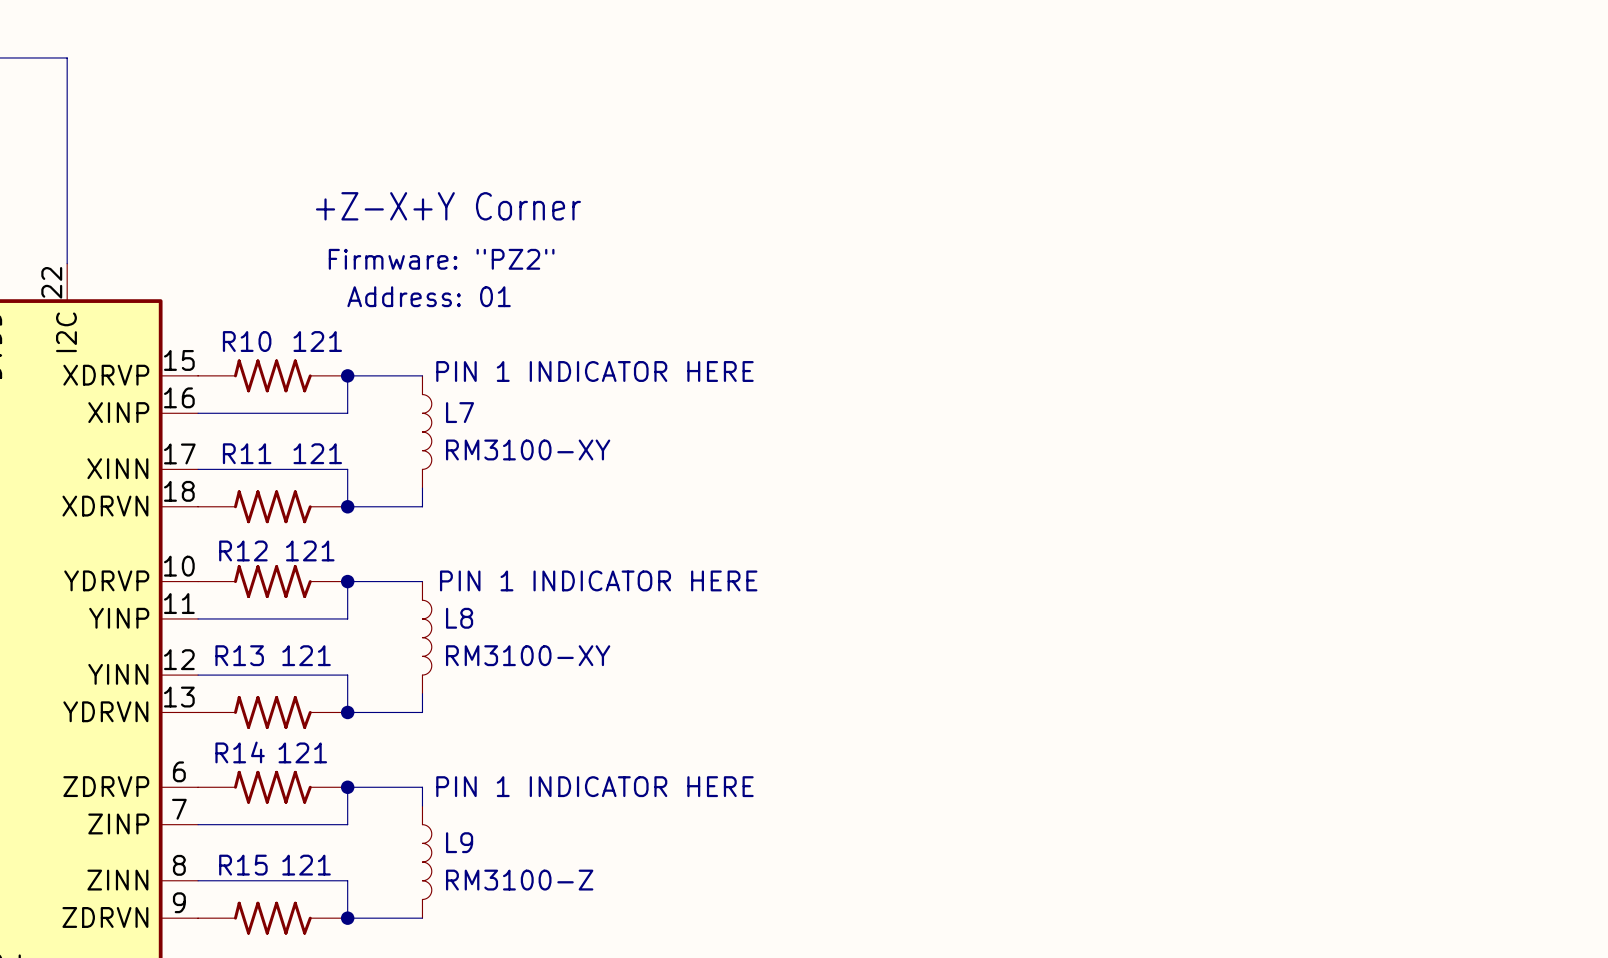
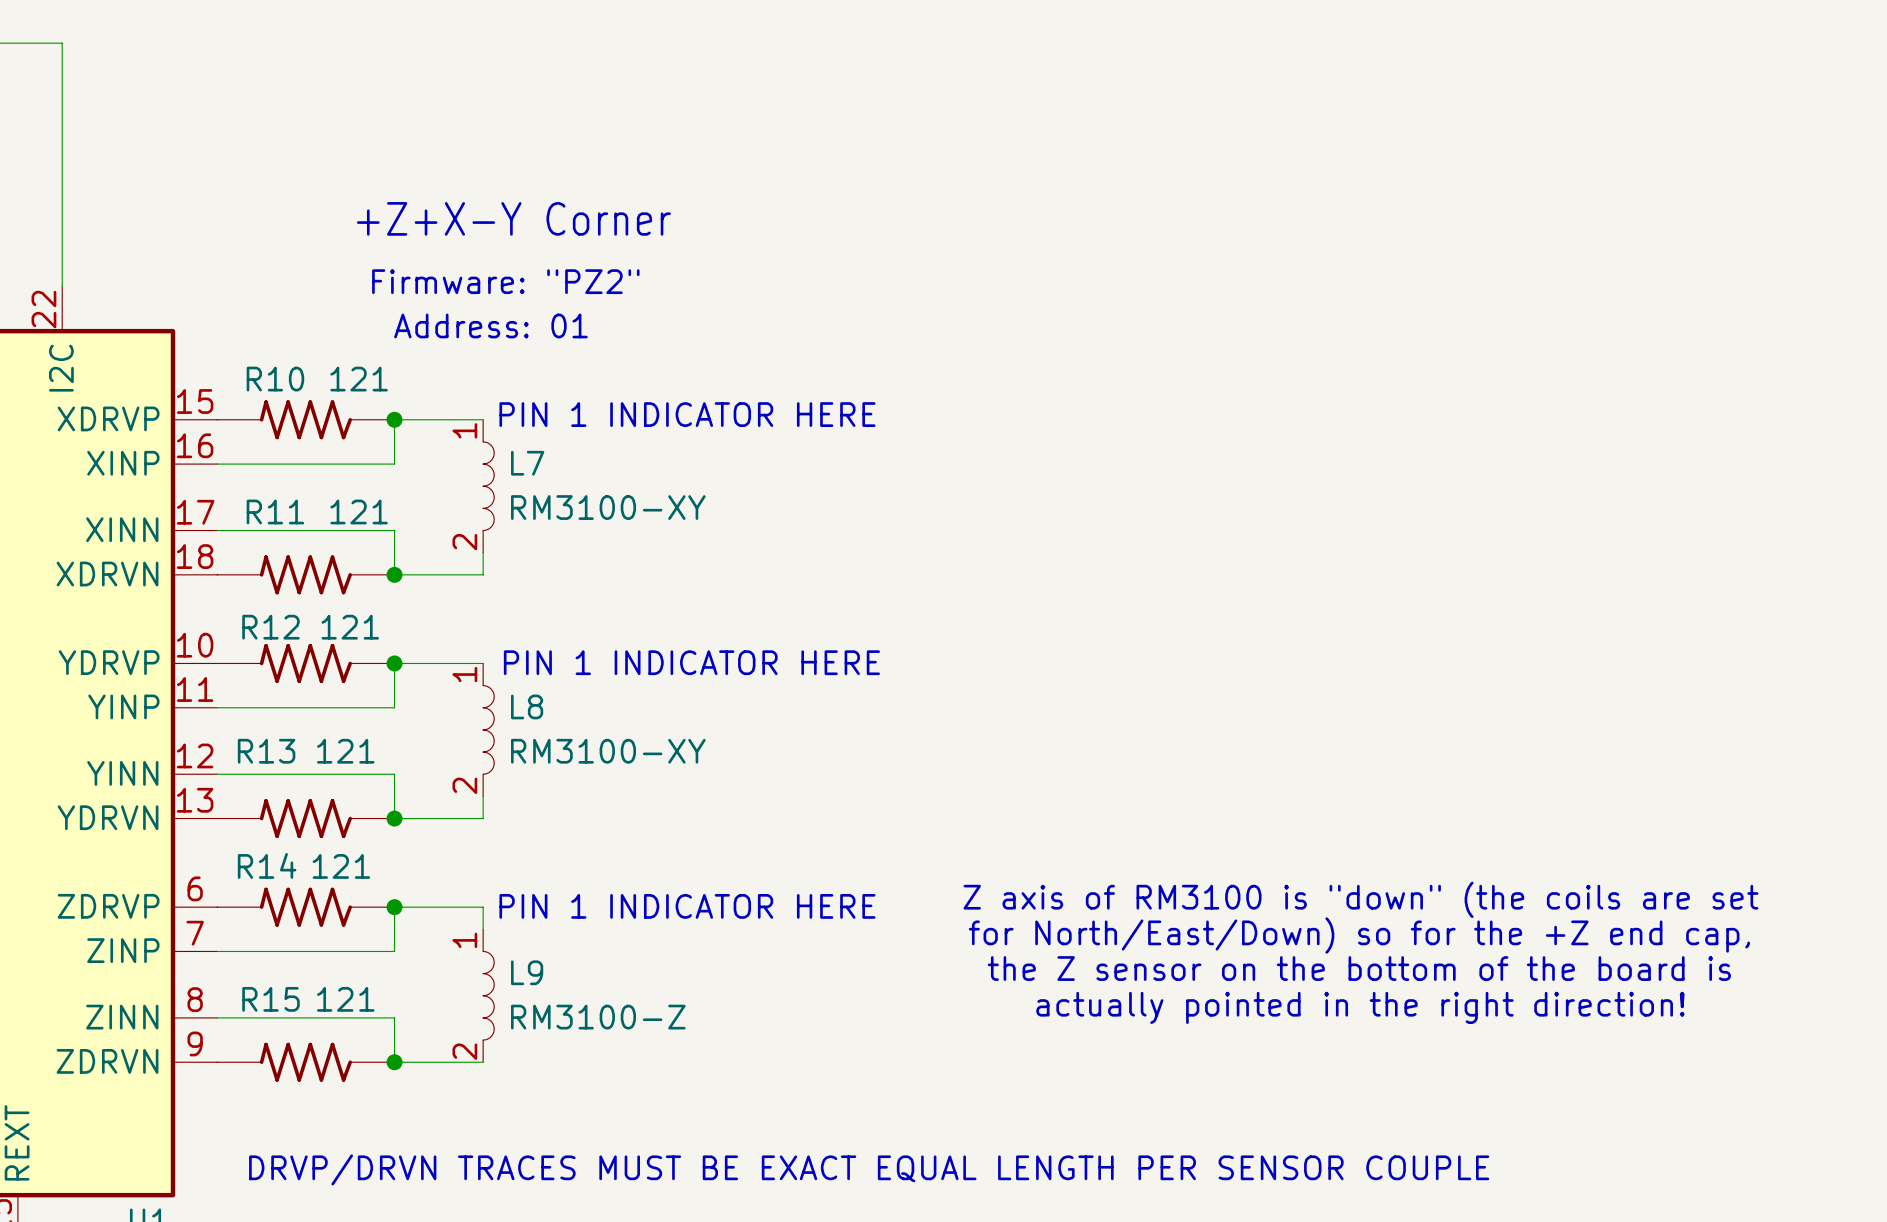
text: +Z-X+Y Corner (448, 206) -> +Z+X-Y Corner (513, 218)
L7 pin number: none -> 1 (464, 430)
L7 pin number: none -> 2 (464, 542)
L8 pin number: none -> 1 (464, 674)
L8 pin number: none -> 2 (464, 785)
text: none -> Z axis of RM3100 is "down" (the coils are set (1360, 899)
text: none -> for North/East/Down) so for the +Z end cap, (1359, 935)
L9 pin number: none -> 1 (464, 940)
text: none -> the Z sensor on the bottom of the board is (1359, 968)
text: none -> actually pointed in the right direction! (1360, 1007)
L9 pin number: none -> 2 (464, 1051)

